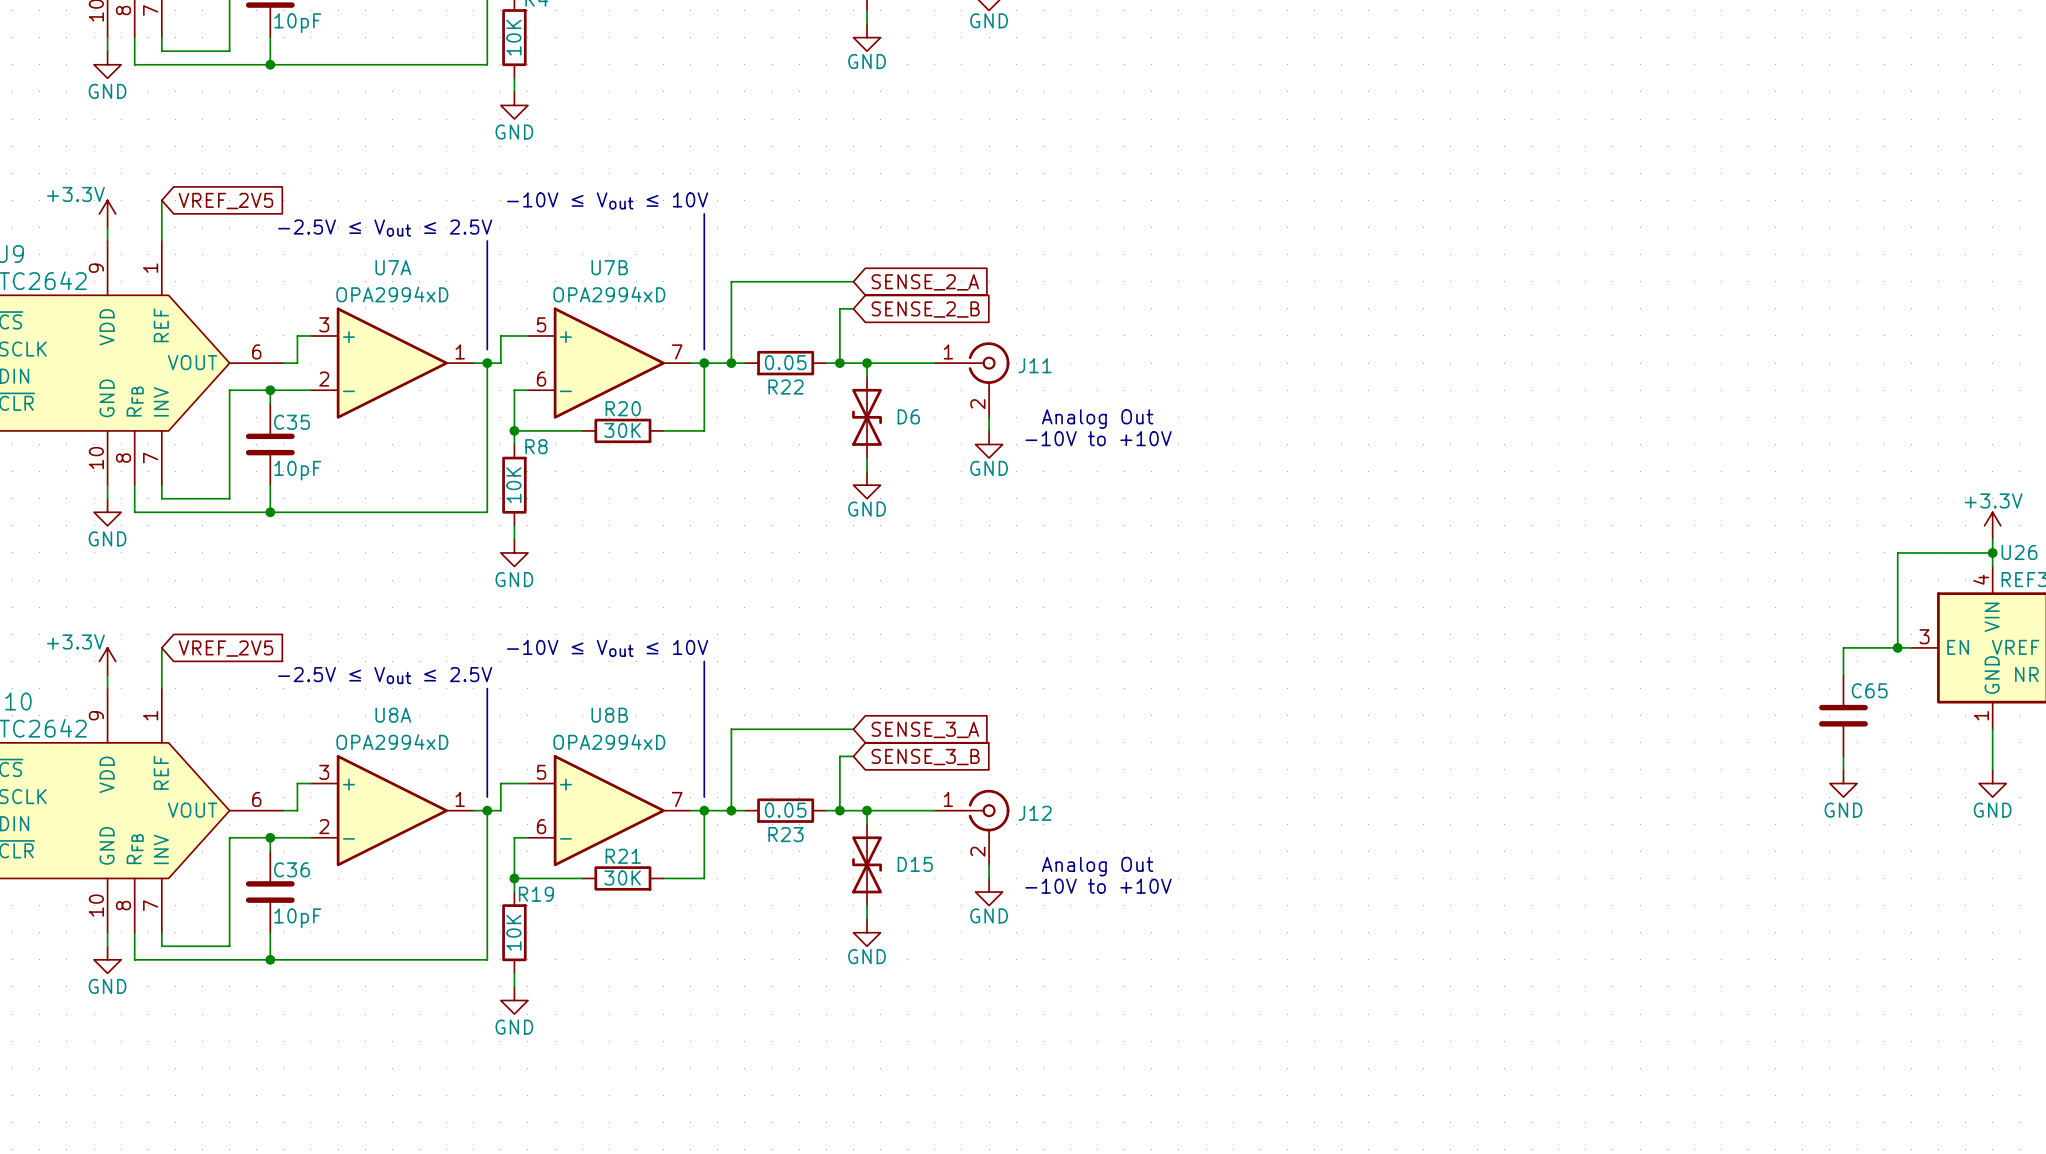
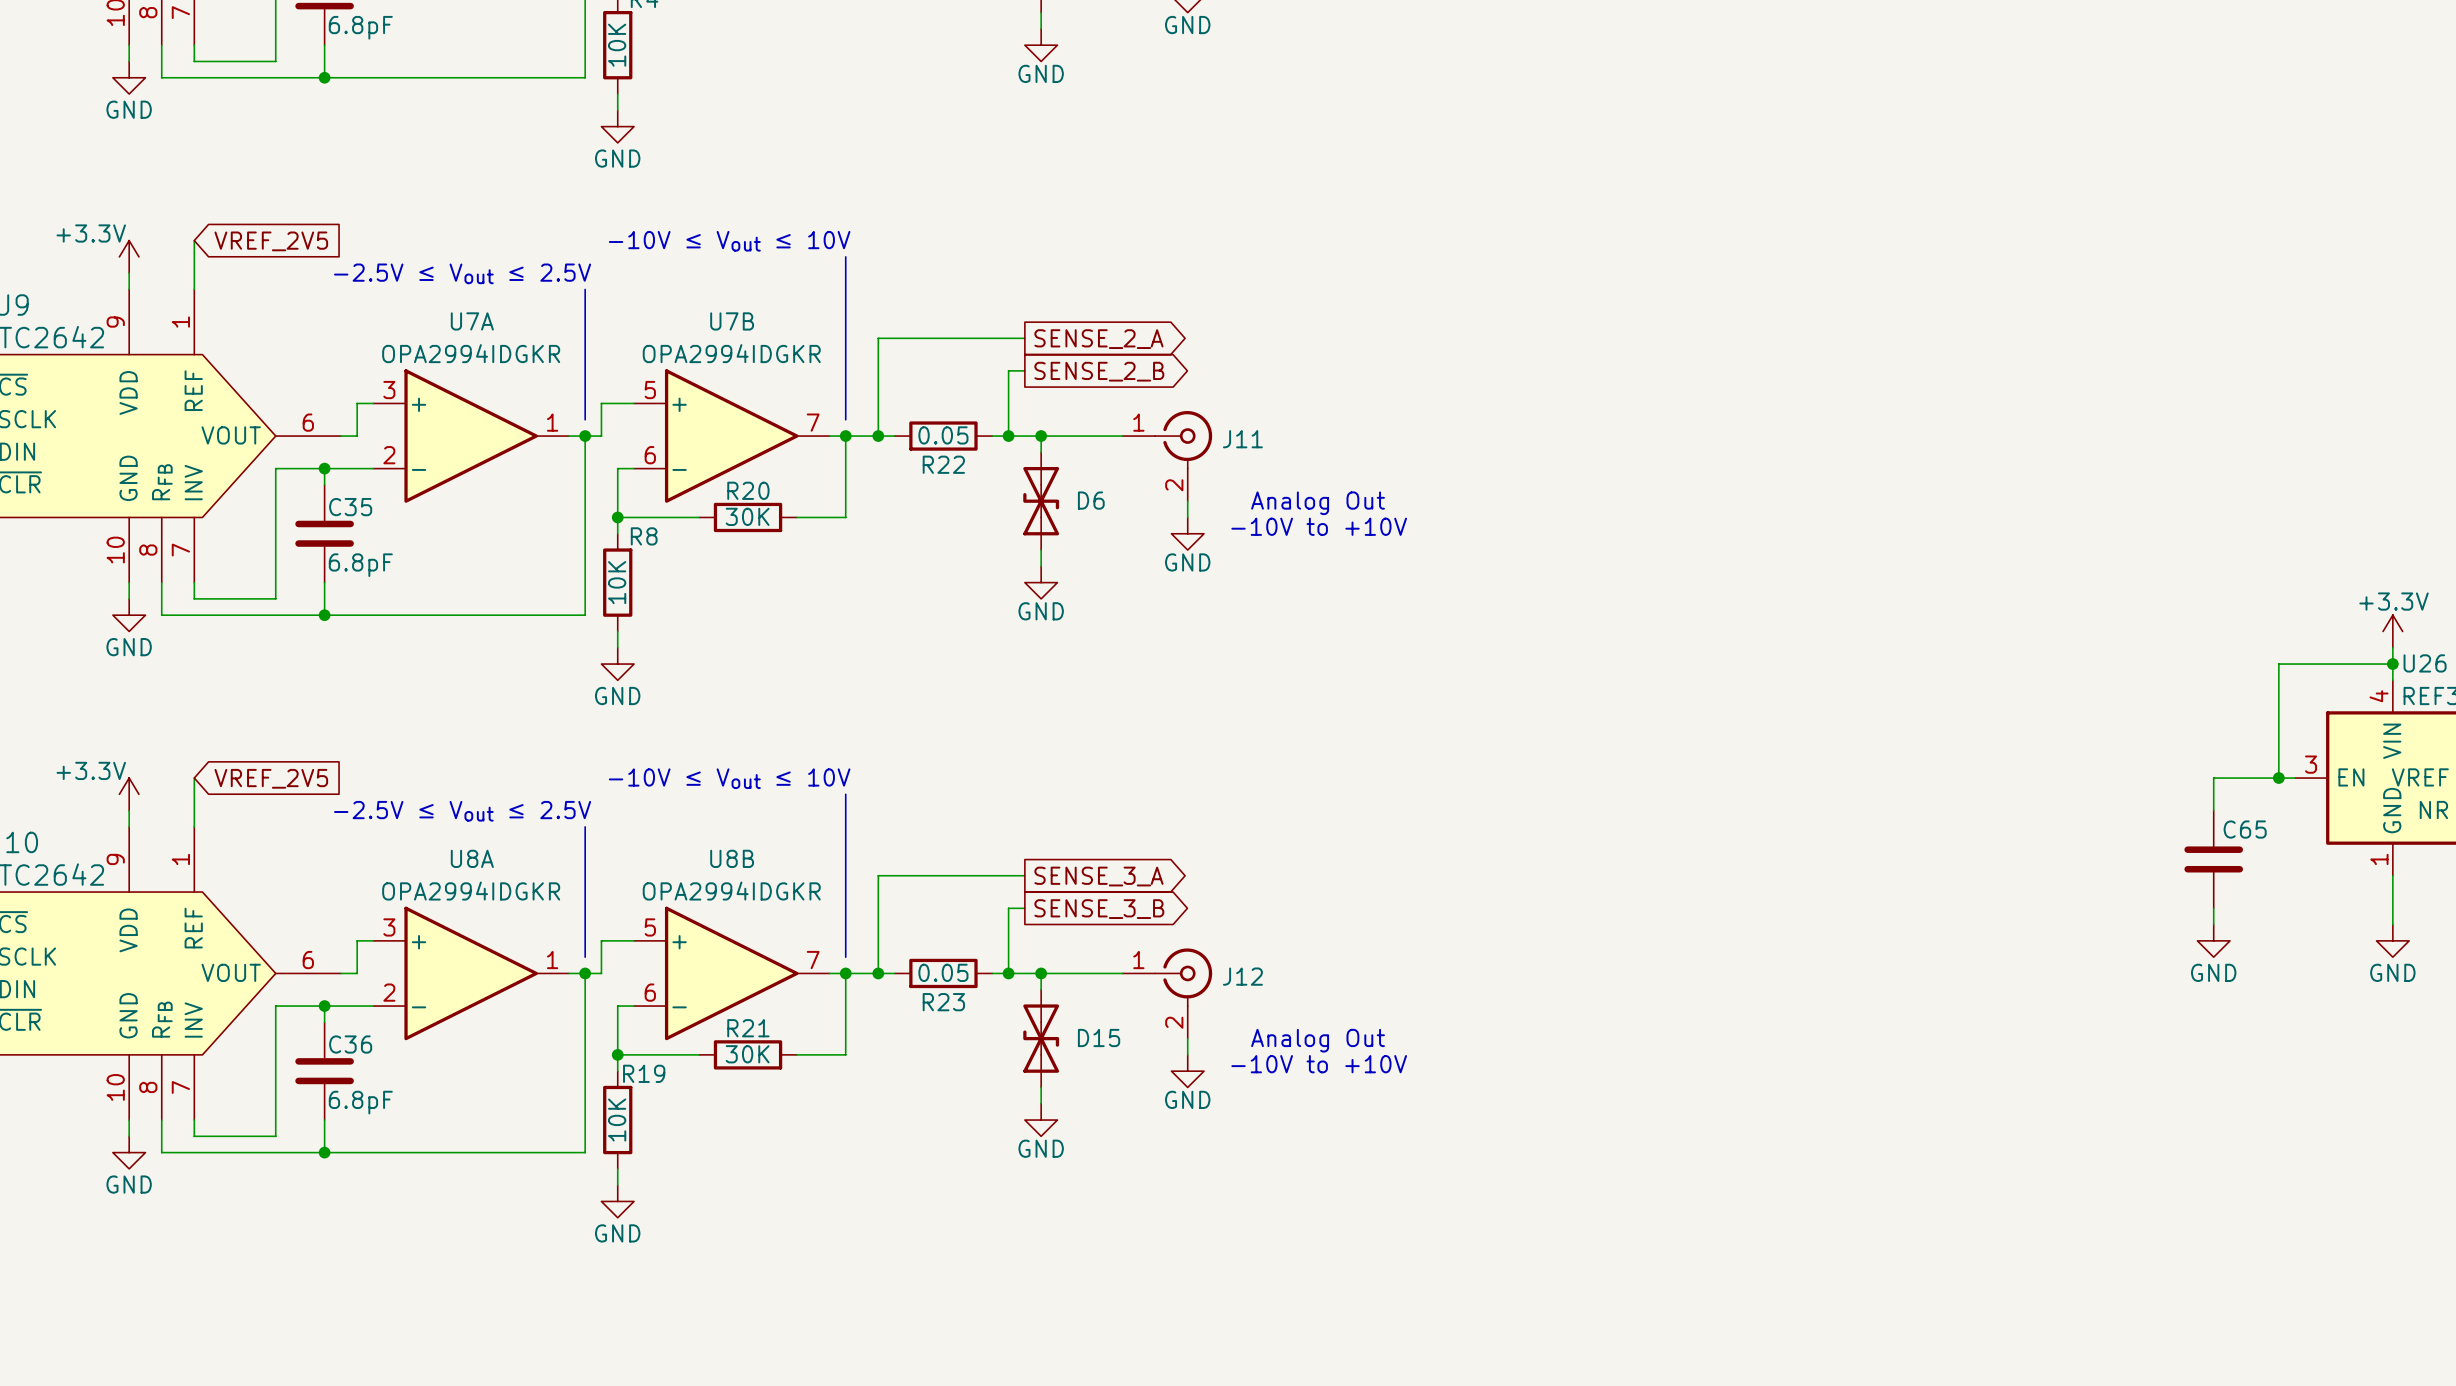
part value: 10pF (297, 23) -> 6.8pF (360, 27)
global label shape: input (925, 282) -> output (1098, 339)
U7A value: OPA2994xD (392, 294) -> OPA2994IDGKR (471, 353)
U7B value: OPA2994xD (609, 294) -> OPA2994IDGKR (731, 353)
global label shape: input (925, 309) -> output (1099, 371)
C35 value: 10pF (297, 470) -> 6.8pF (360, 565)
global label shape: input (925, 729) -> output (1098, 876)
U8A value: OPA2994xD (392, 742) -> OPA2994IDGKR (471, 891)
U8B value: OPA2994xD (609, 742) -> OPA2994IDGKR (731, 891)
global label shape: input (925, 757) -> output (1099, 909)
C36 value: 10pF (297, 918) -> 6.8pF (360, 1102)

